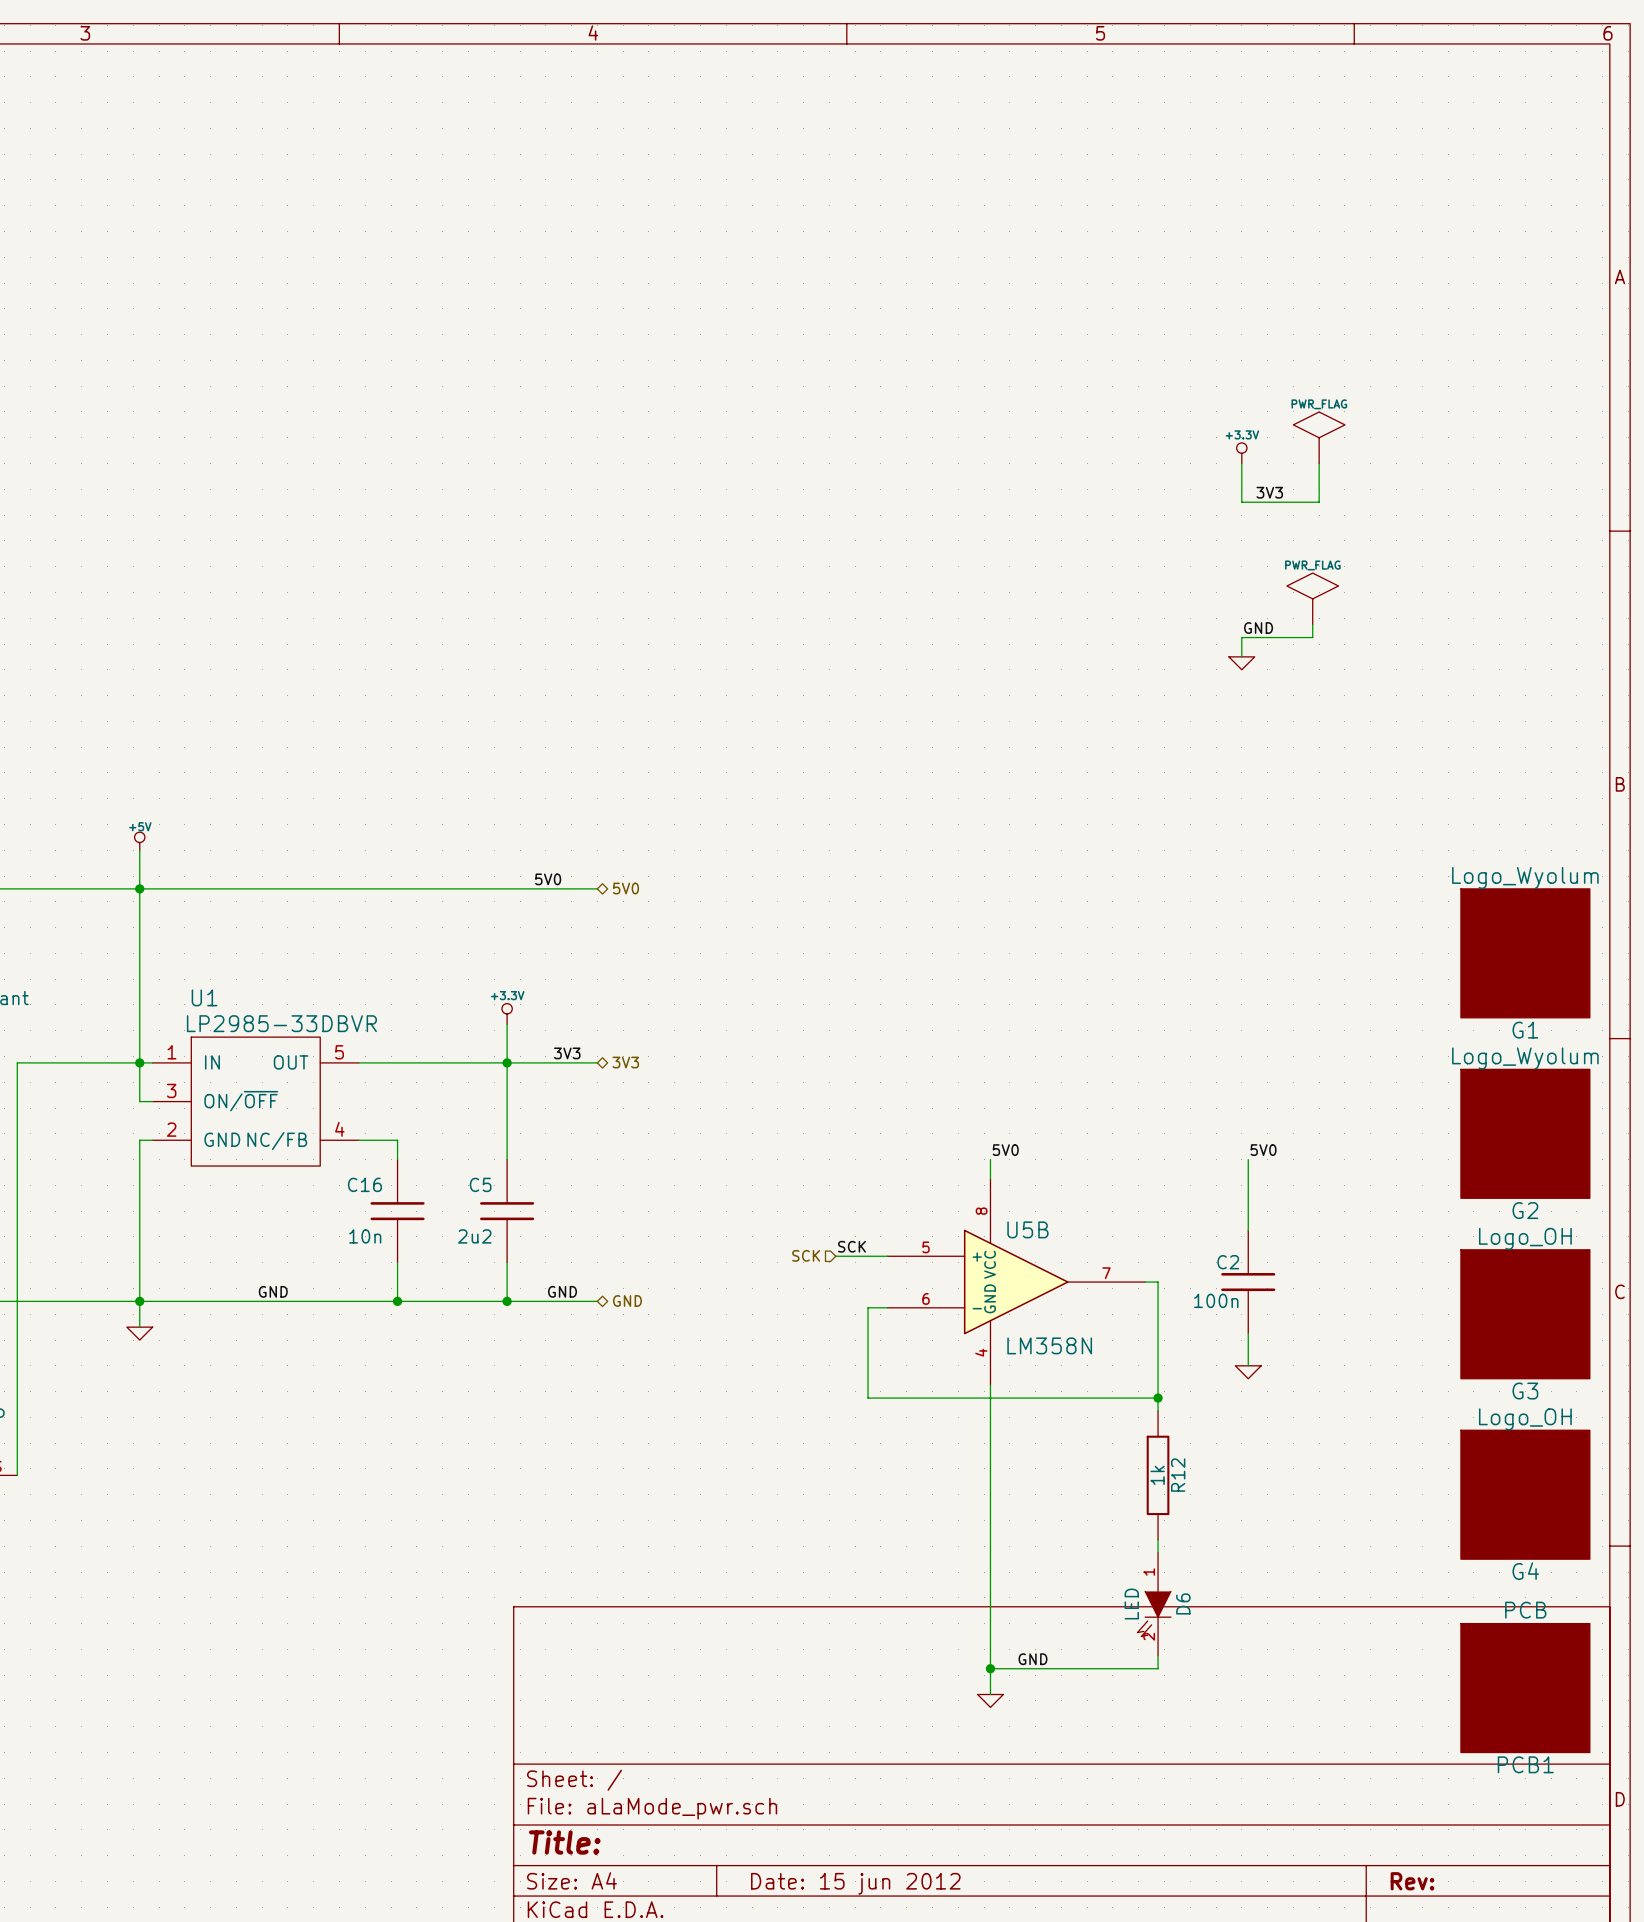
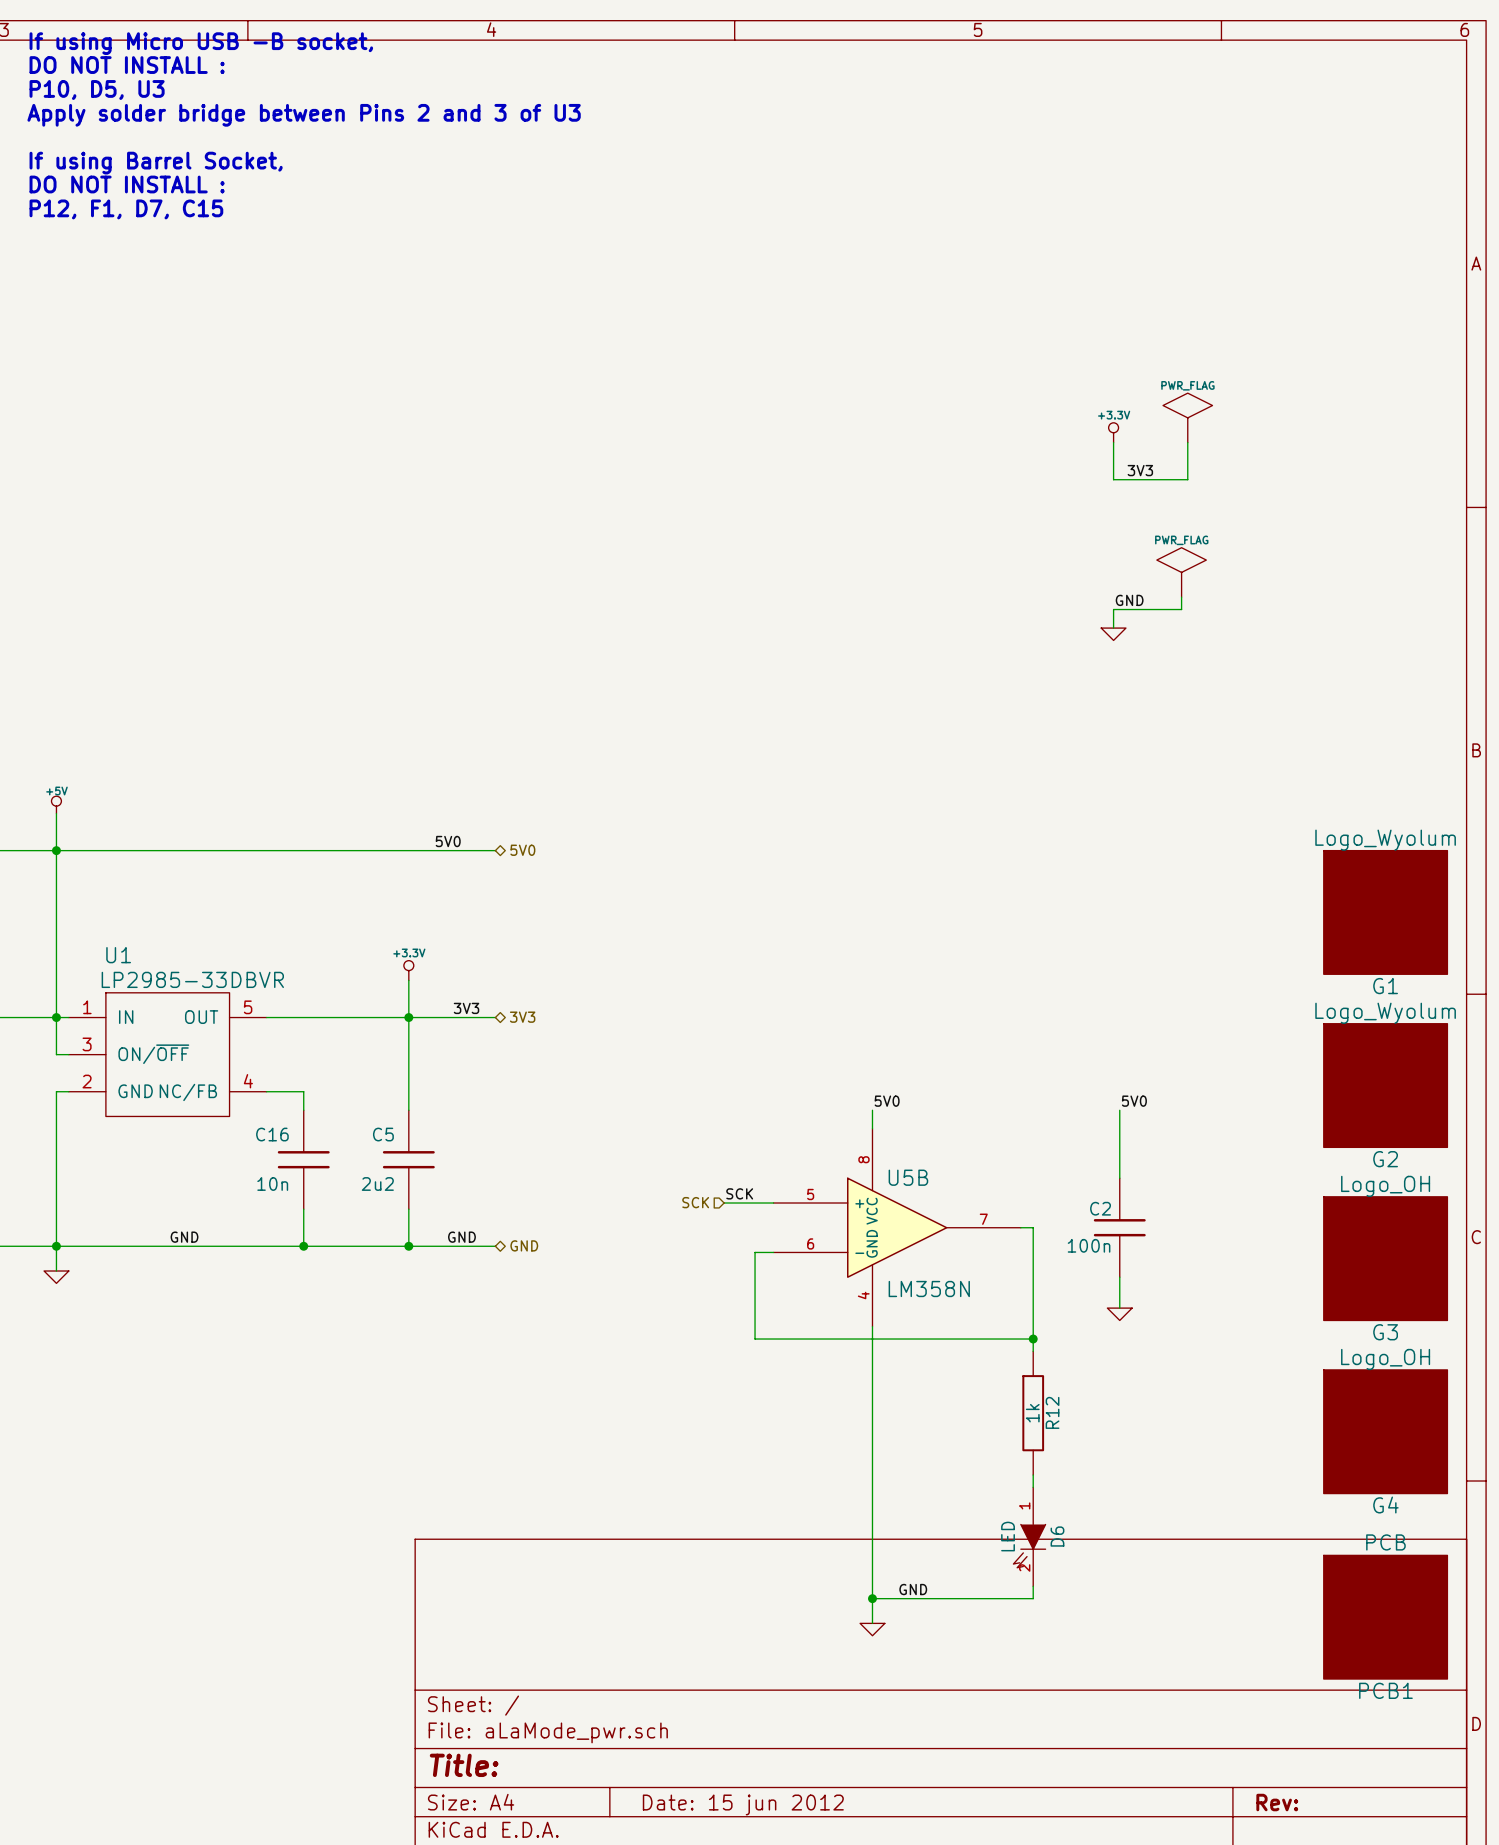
text: none -> If using Micro USB -B socket, (201, 43)
text: none -> DO NOT INSTALL : (127, 65)
text: none -> P10, D5, U3 (97, 90)
text: none -> Apply solder bridge between Pins 2 and 3 of U3 (304, 115)
text: none -> If using Barrel Socket, (156, 163)
text: none -> DO NOT INSTALL : (127, 184)
text: none -> P12, F1, D7, C15 (126, 209)

